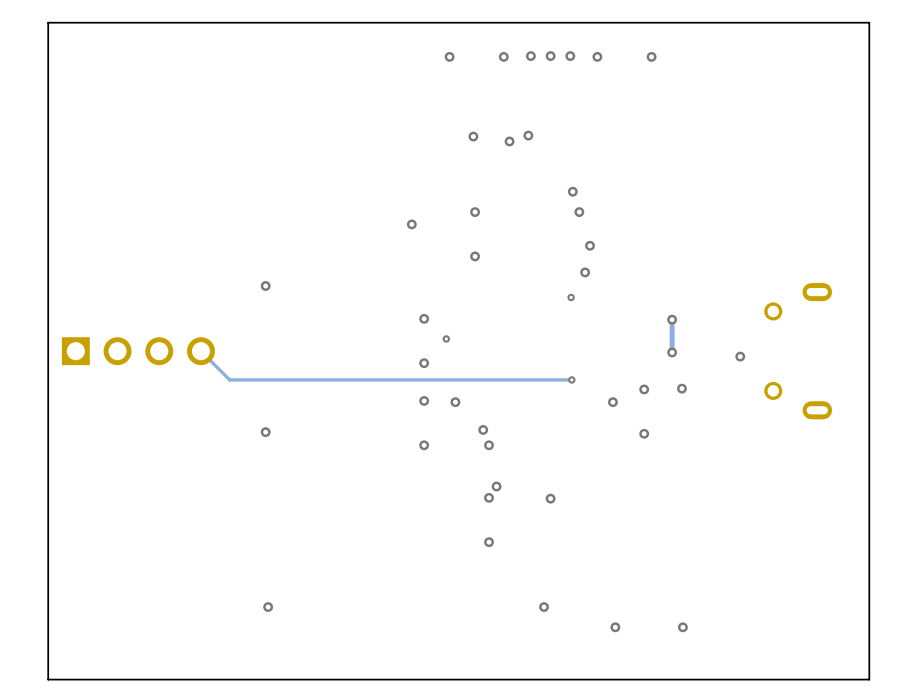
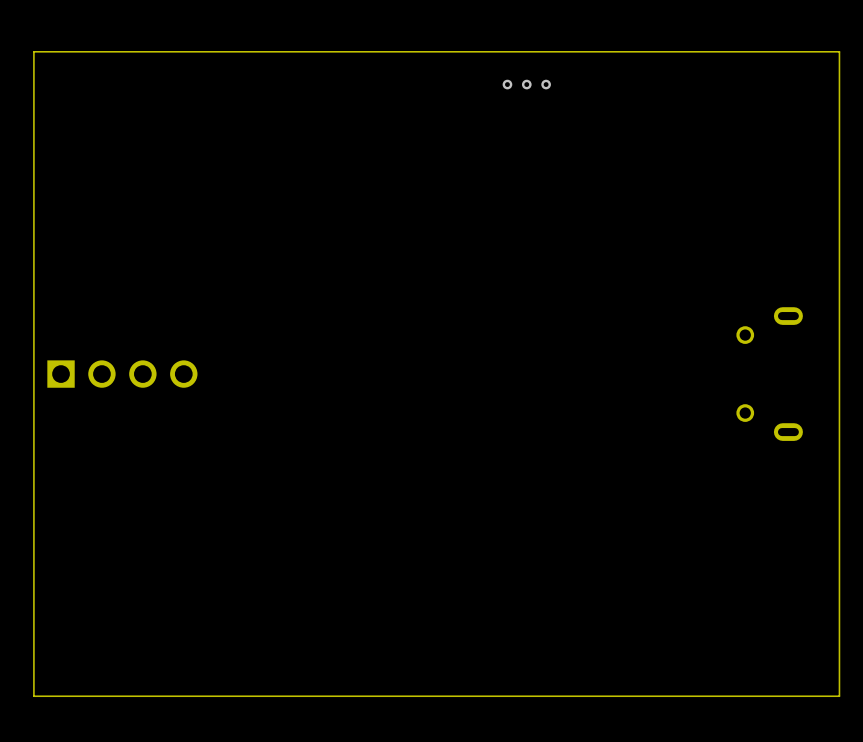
via: (449, 56) -> none
via: (503, 56) -> none
via: (597, 56) -> none
via: (651, 56) -> none
via: (528, 135) -> none
via: (473, 136) -> none
via: (509, 141) -> none
via: (572, 191) -> none
via: (475, 212) -> none
via: (579, 212) -> none
via: (411, 224) -> none
via: (590, 245) -> none
via: (475, 256) -> none
via: (585, 272) -> none
via: (265, 285) -> none
via: (571, 297) -> none
via: (424, 318) -> none
track: (672, 319) (672, 352) -> none
via: (672, 319) -> none
via: (446, 338) -> none
track: (200, 351) (229, 379) (571, 379) -> none
via: (672, 352) -> none
via: (740, 356) -> none
via: (424, 363) -> none
via: (571, 379) -> none
via: (681, 388) -> none
via: (644, 389) -> none
via: (424, 400) -> none
via: (455, 402) -> none
via: (612, 402) -> none
via: (483, 429) -> none
via: (265, 432) -> none
via: (644, 433) -> none
via: (424, 445) -> none
via: (489, 445) -> none
via: (496, 486) -> none
via: (489, 497) -> none
via: (550, 498) -> none
via: (489, 542) -> none
via: (268, 607) -> none
via: (544, 607) -> none
via: (615, 627) -> none
via: (682, 627) -> none

